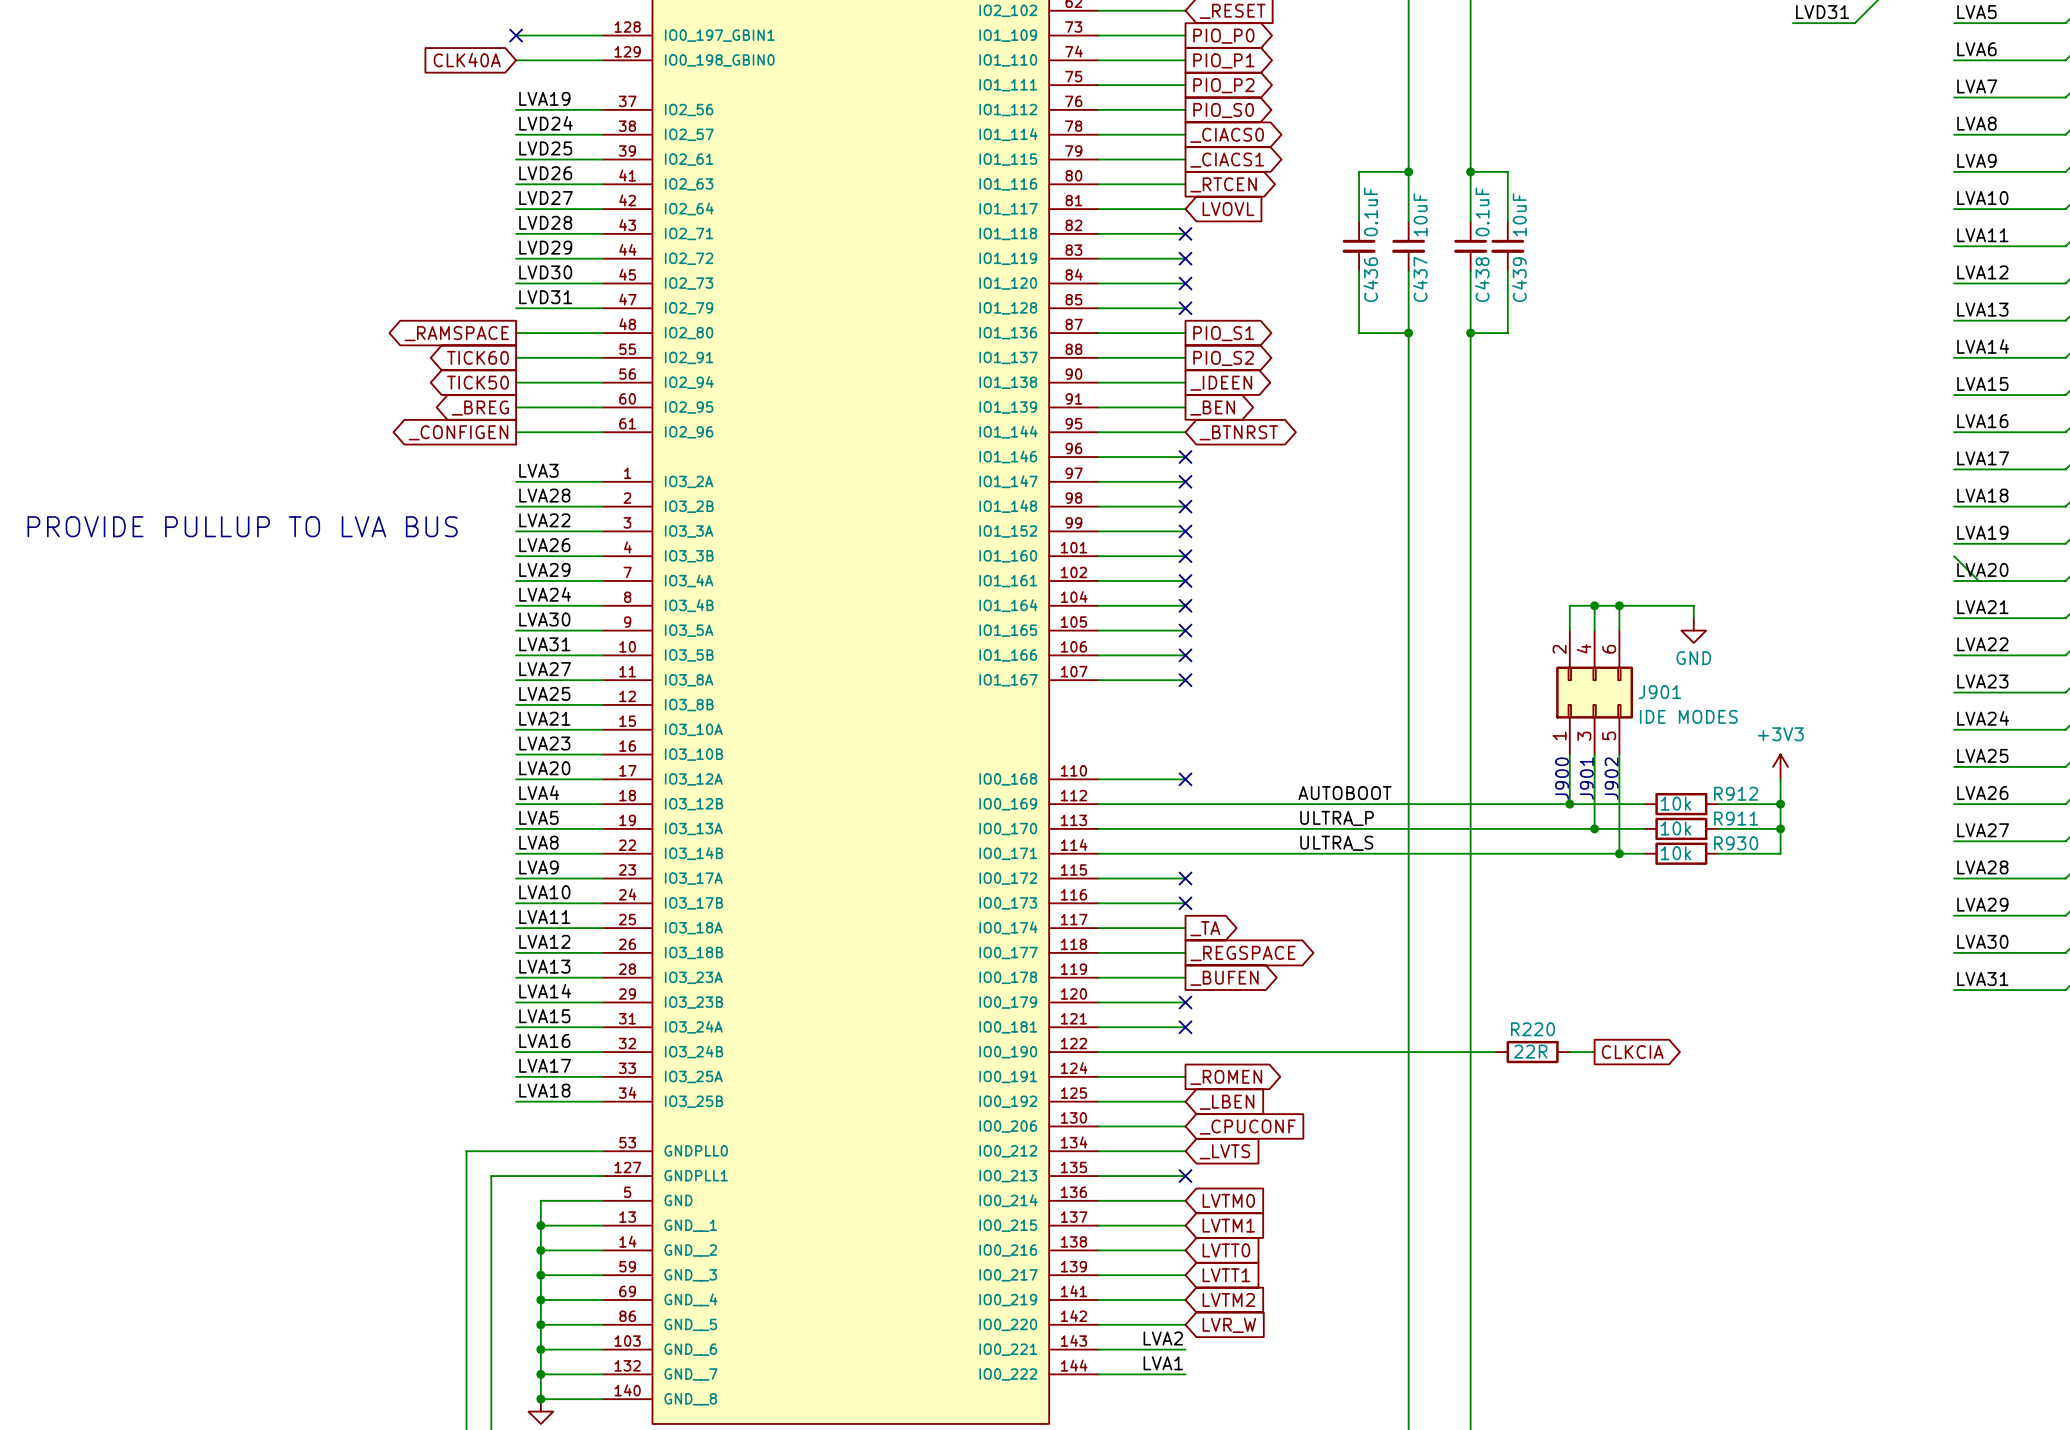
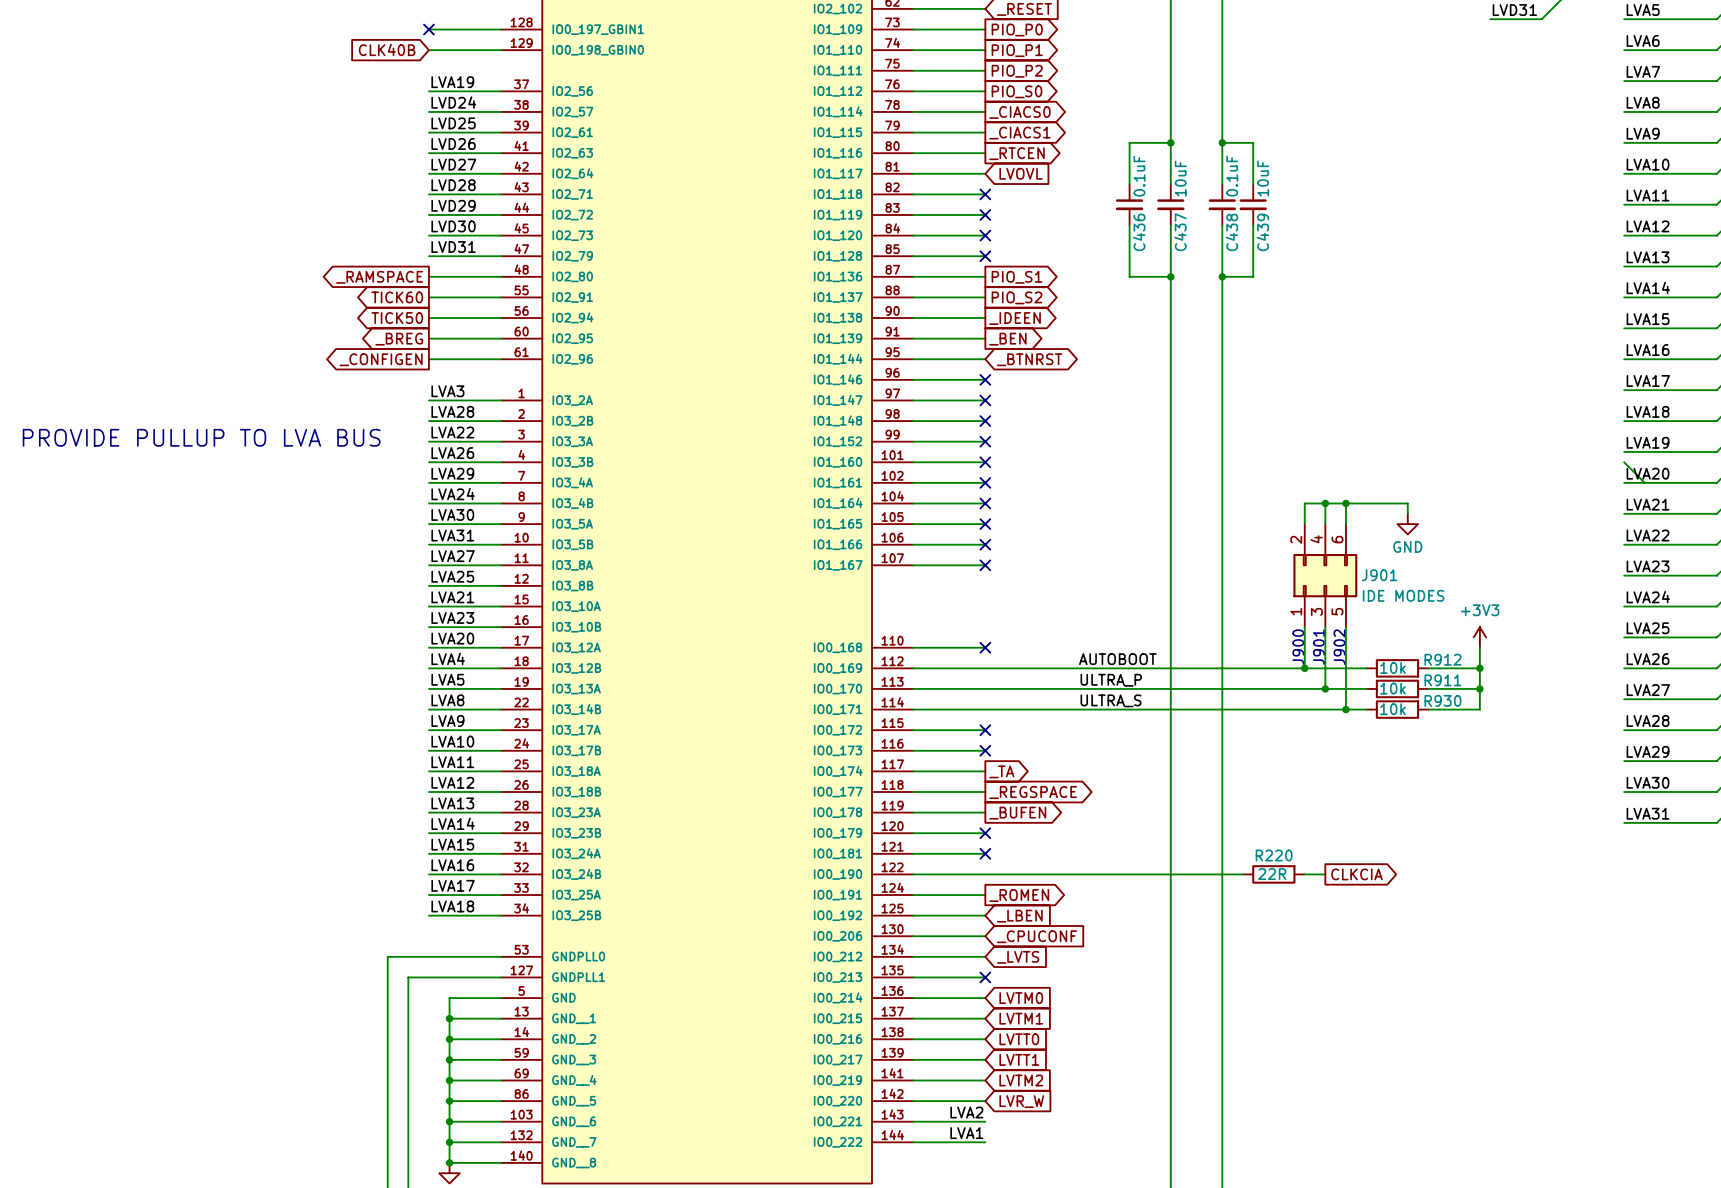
global label: CLK40A (467, 60) -> CLK40B (387, 49)

